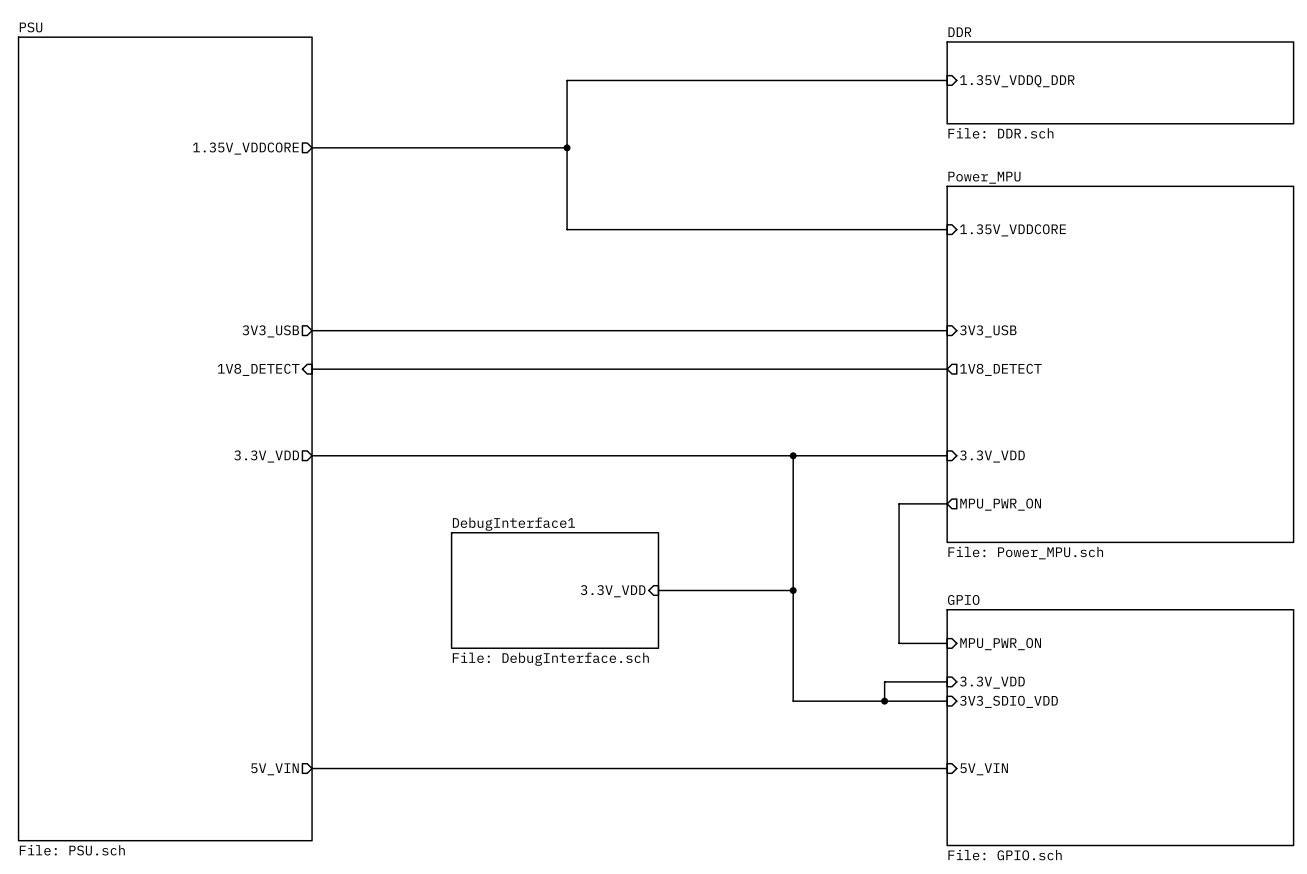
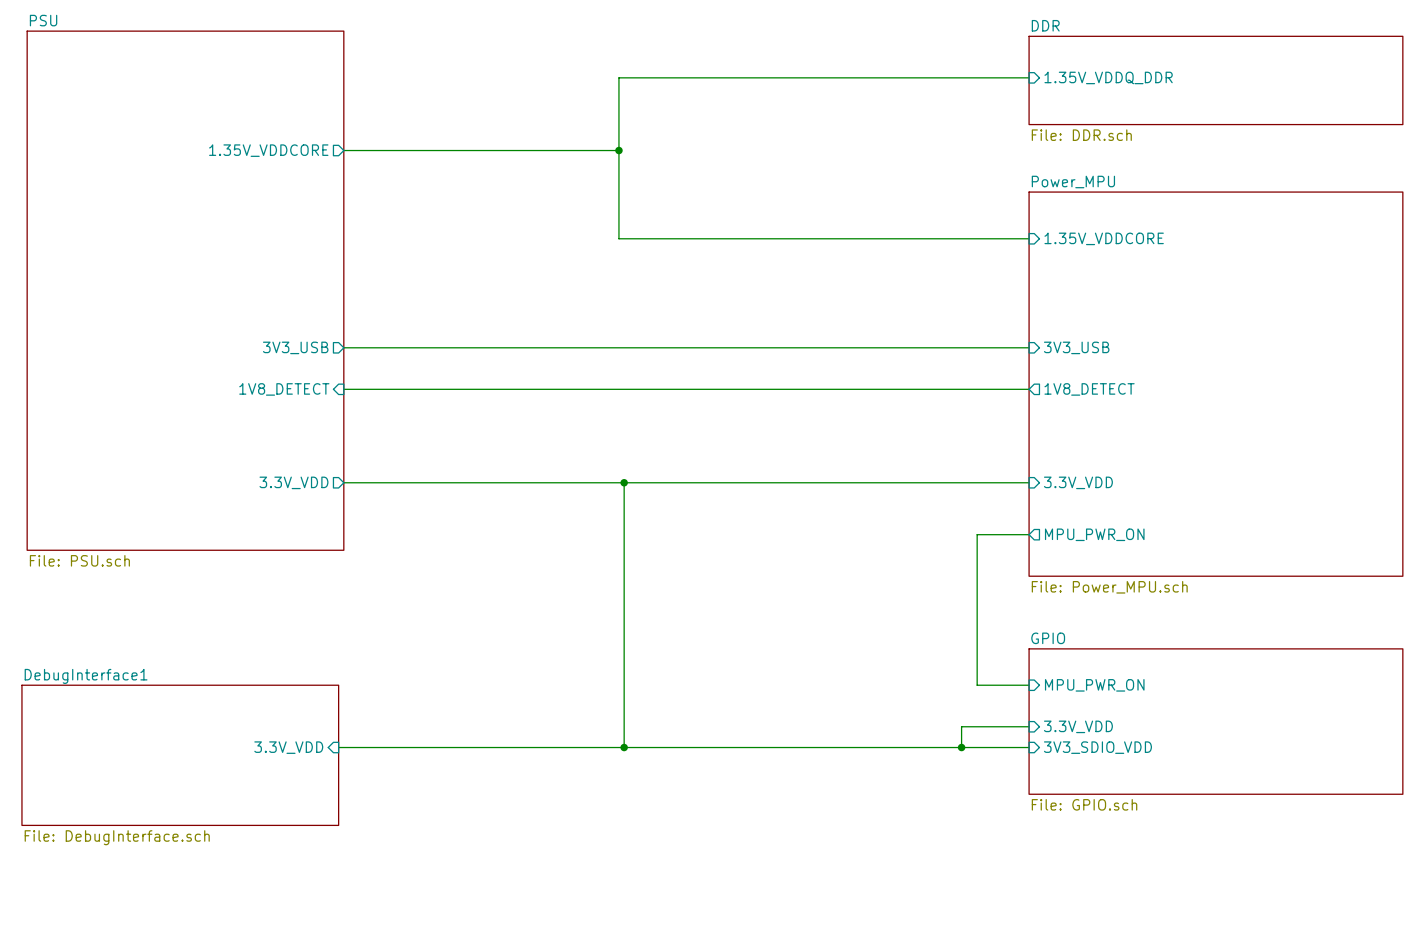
sheet PSU: none -> File: PSU.sch (185, 290)
sheet PSU: File: PSU.sch (165, 438) -> none
wire: none -> (624, 482) (624, 747)
junction: none -> (624, 482)
wire: (793, 455) (793, 701) -> (338, 747) (862, 747)
junction: (793, 455) -> none
sheet DebugInterface1 name position: DebugInterface1 (513, 524) -> DebugInterface1 (86, 676)
sheet DebugInterface1 shape: [451, 532, 659, 649] -> [21, 685, 339, 826]
wire: (658, 590) (793, 590) -> none
junction: (793, 590) -> none
sheet pin: 3.3V_VDD (613, 591) -> none
sheet DebugInterface1 value position: File: DebugInterface.sch (550, 659) -> File: DebugInterface.sch (117, 837)
sheet GPIO: none -> File: GPIO.sch (1215, 721)
sheet pin: none -> 3.3V_VDD (288, 747)
junction: none -> (624, 747)
sheet GPIO: File: GPIO.sch (1120, 727) -> none
wire: (312, 768) (947, 768) -> none
sheet pin: 5V_VIN (274, 769) -> none
sheet pin: 5V_VIN (984, 769) -> none

